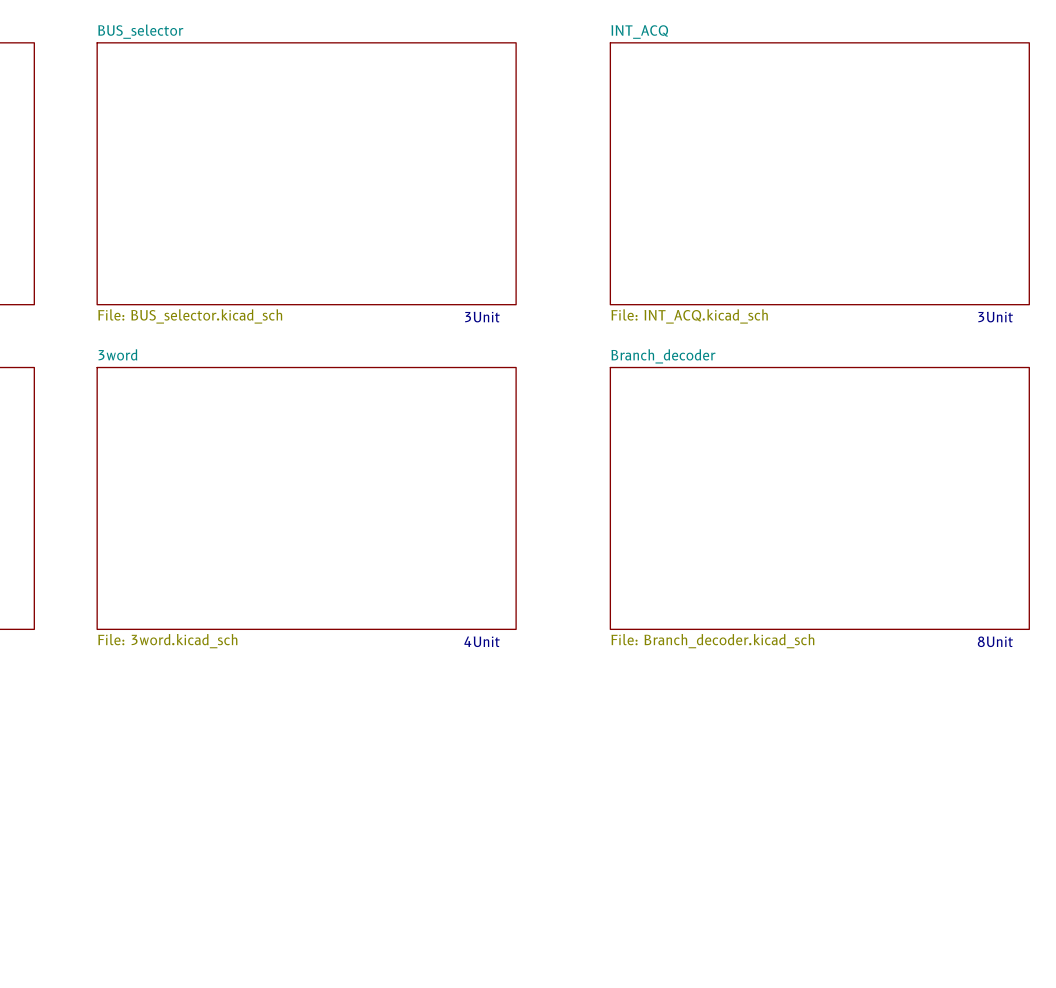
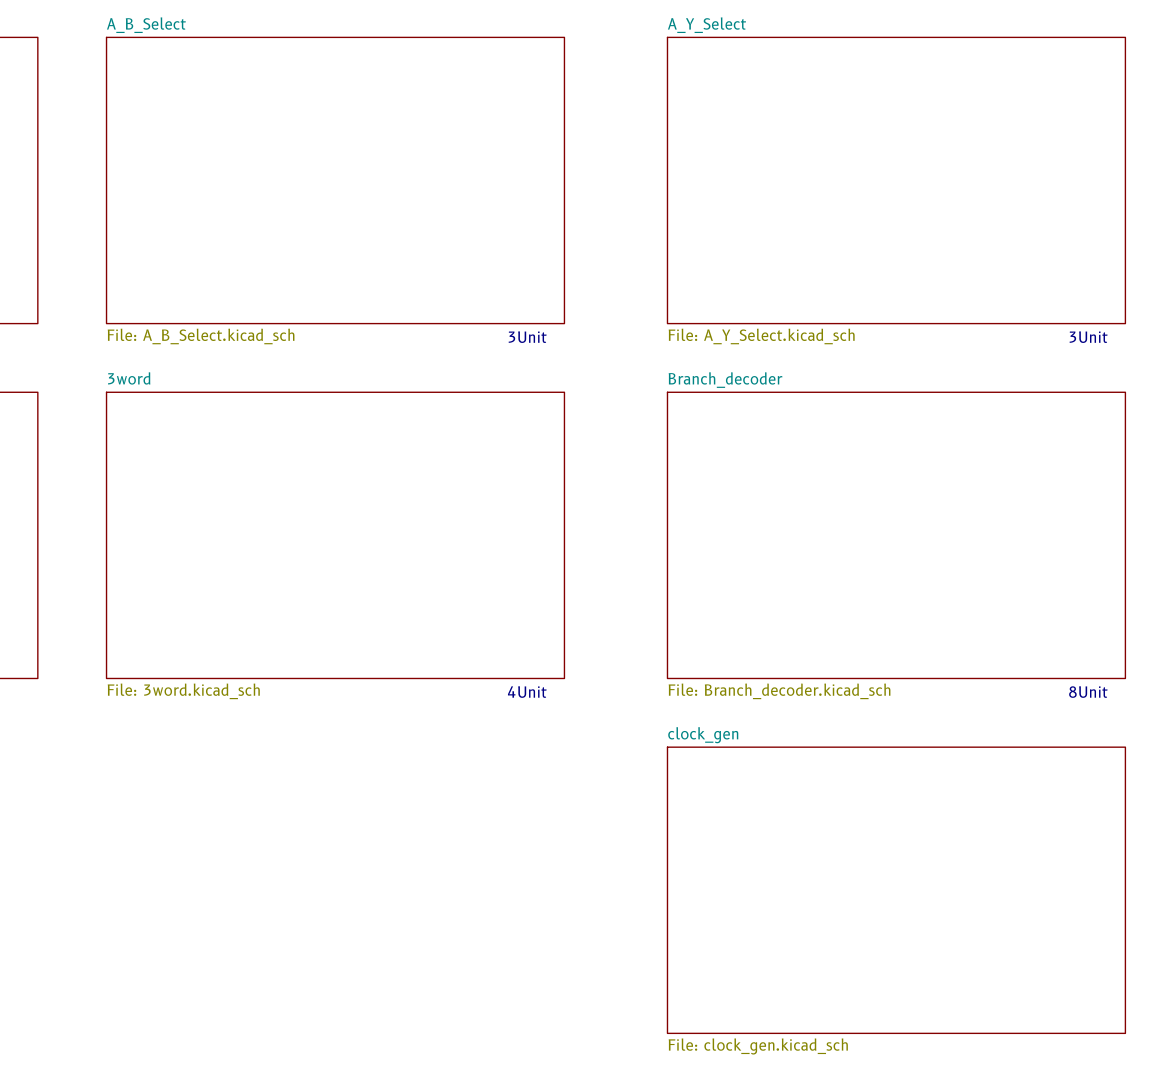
sheet BUS_selector name: BUS_selector (140, 31) -> A_B_Select (146, 25)
sheet INT_ACQ name: INT_ACQ (639, 32) -> A_Y_Select (706, 25)
sheet BUS_selector value: File: BUS_selector.kicad_sch (190, 316) -> File: A_B_Select.kicad_sch (201, 336)
sheet INT_ACQ value: File: INT_ACQ.kicad_sch (689, 316) -> File: A_Y_Select.kicad_sch (761, 336)
sheet clock_gen: none -> File: clock_gen.kicad_sch (896, 890)

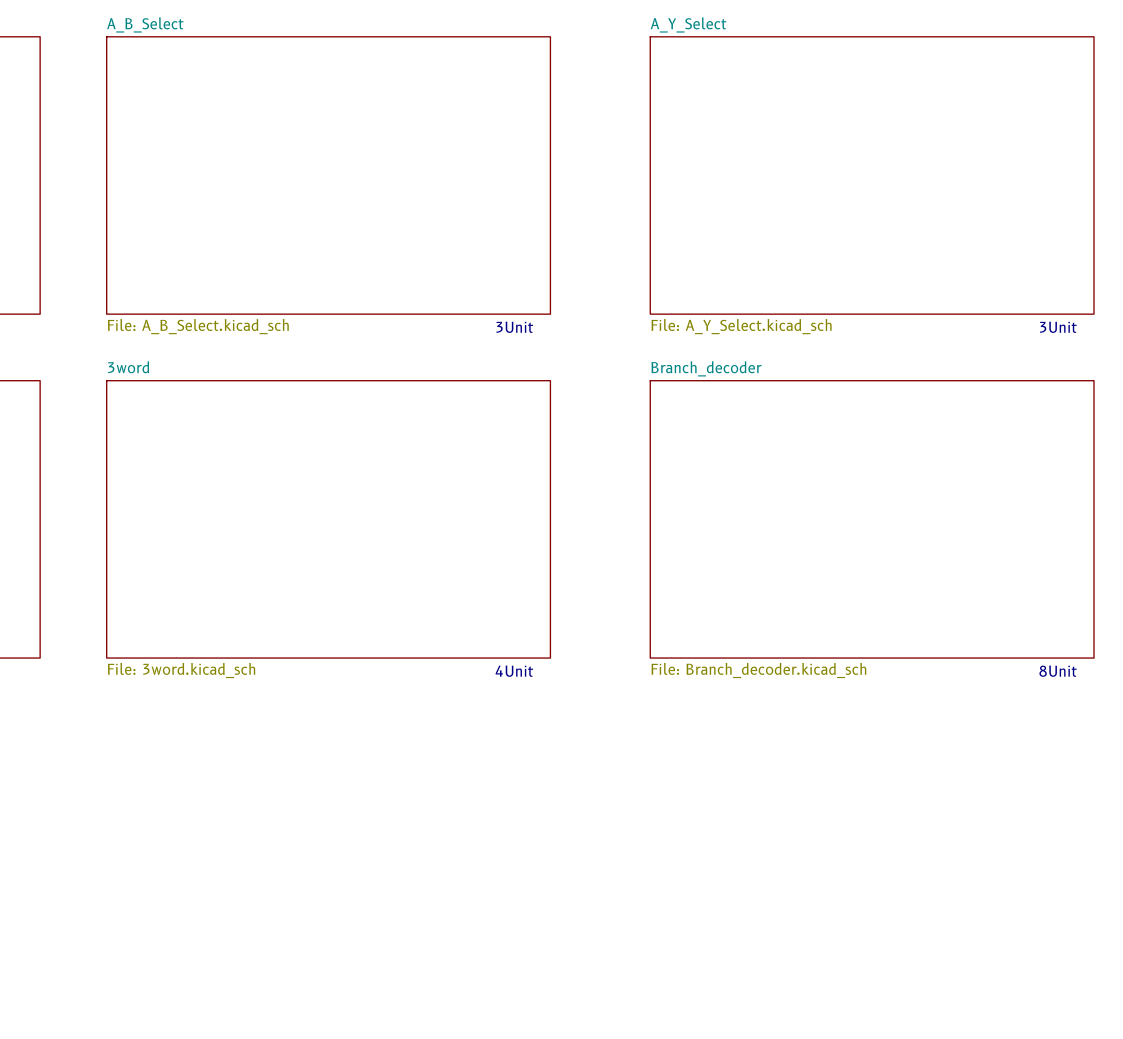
sheet clock_gen: File: clock_gen.kicad_sch (896, 890) -> none

